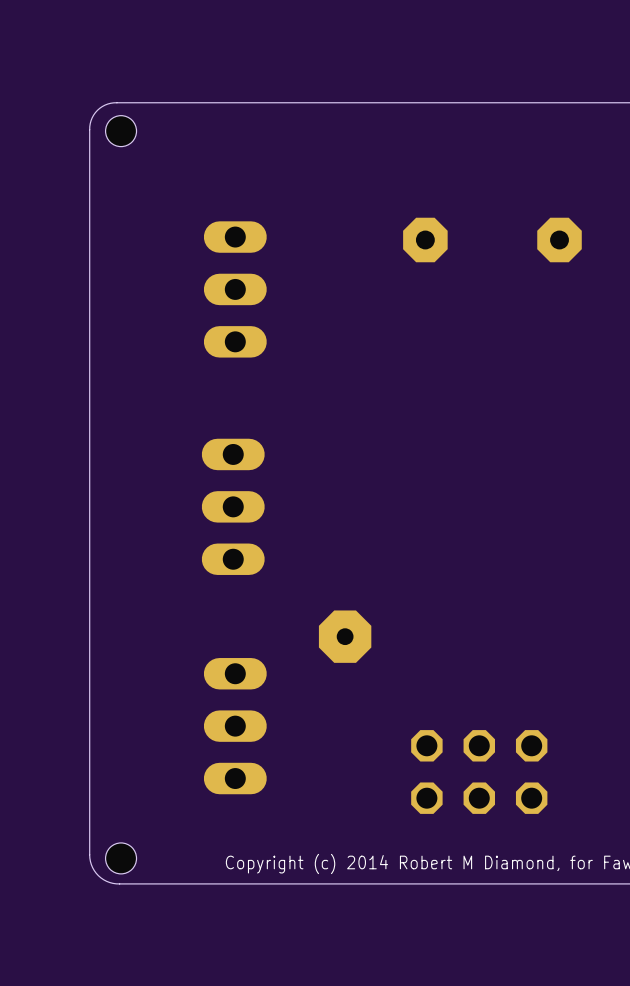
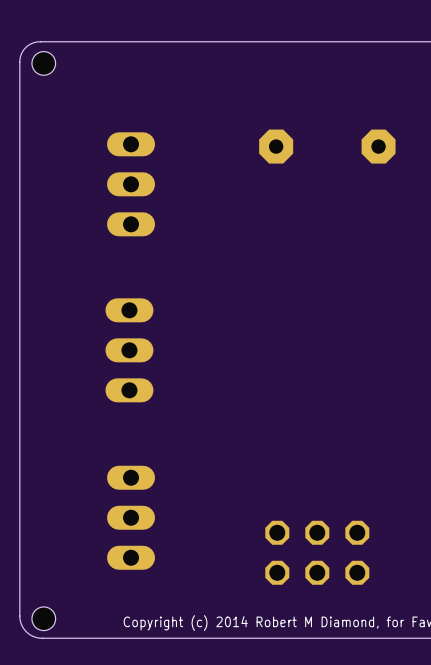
part: (345, 636) -> none

